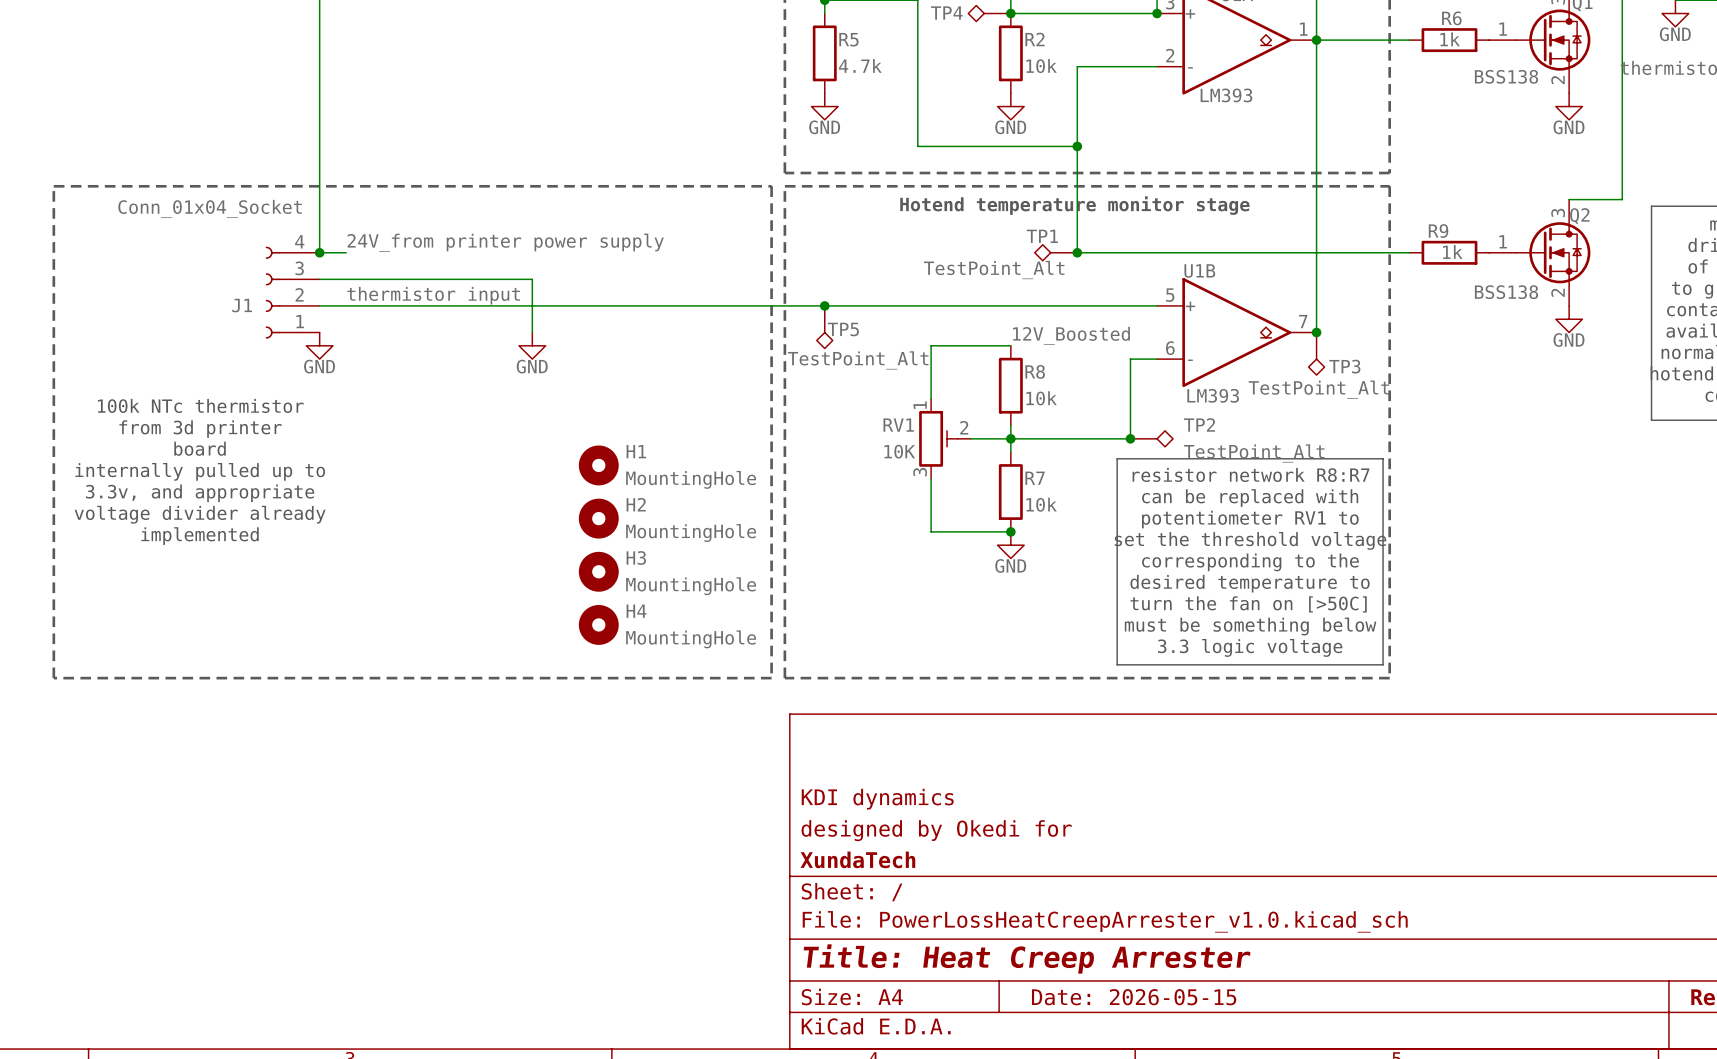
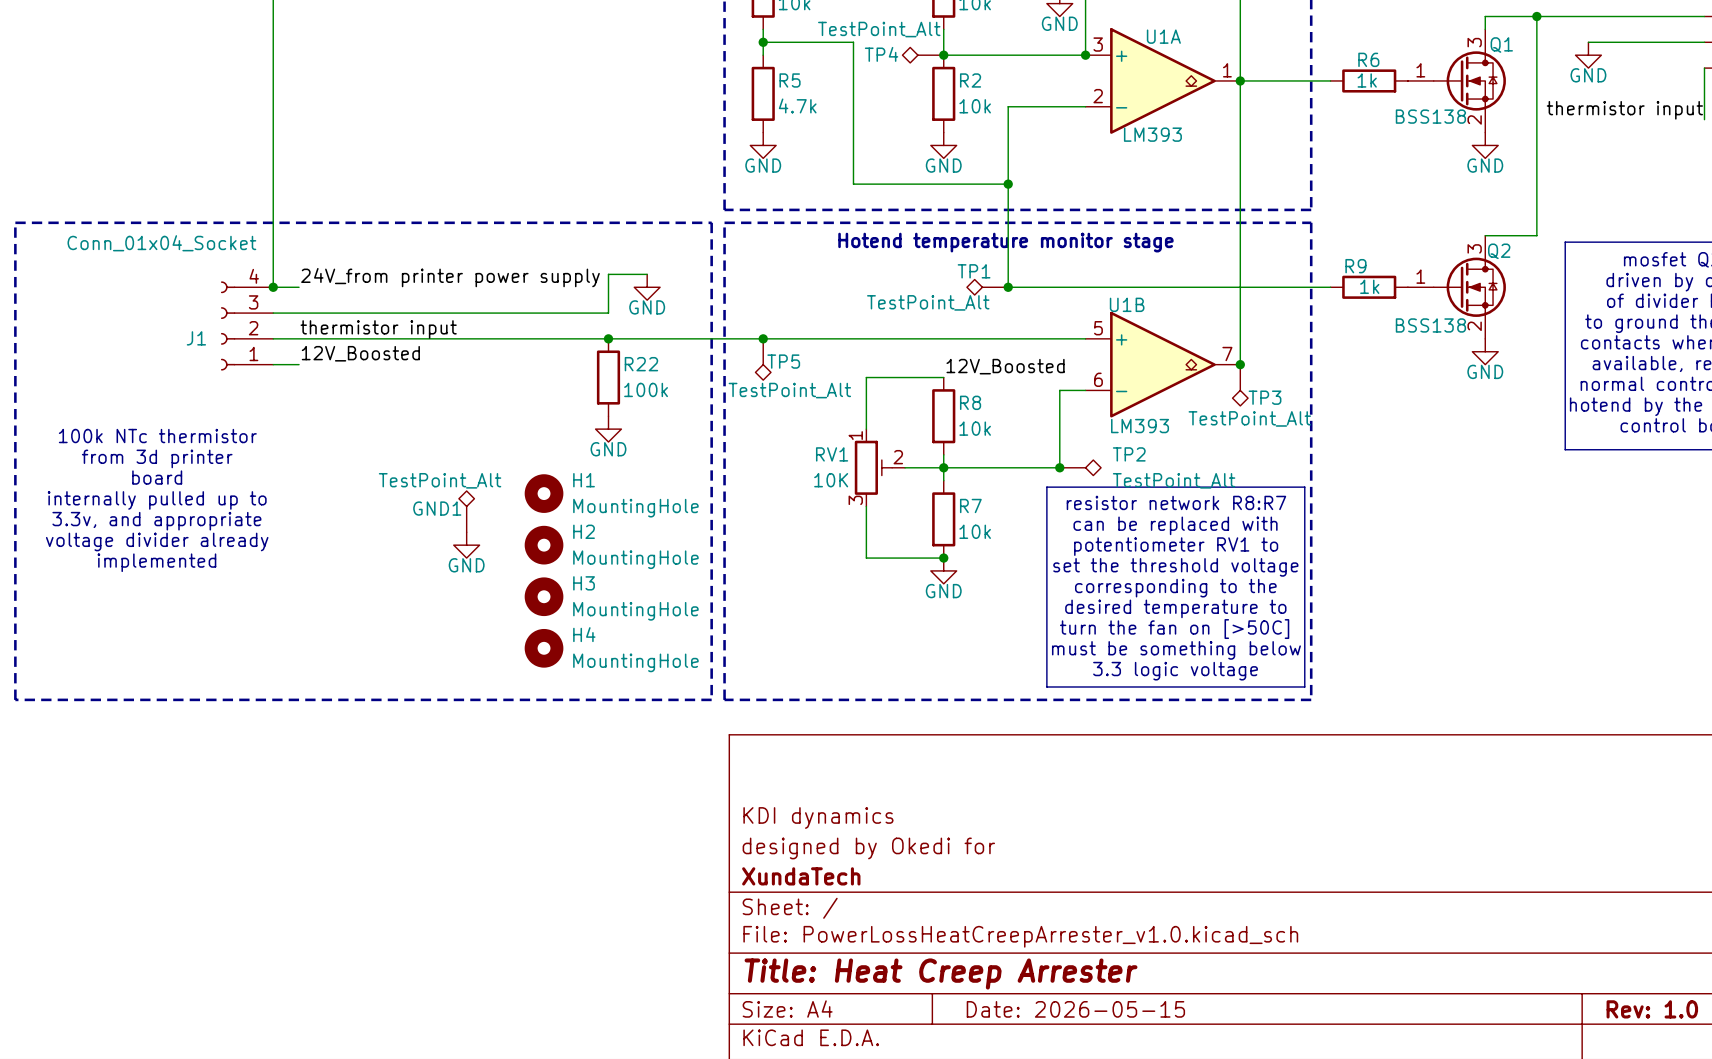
power symbol: none -> GND (647, 287)
wire: (532, 279) (532, 332) -> (479, 313) (608, 313) (608, 274) (647, 274)
junction: none -> (608, 338)
label: none -> 12V_Boosted (360, 353)
wire: none -> (273, 364) (299, 364)
power symbol: GND (319, 345) -> none
power symbol: GND (532, 345) -> none
R22: none -> 100k (608, 377)
power symbol: none -> GND (608, 429)
GND1: none -> TestPoint_Alt (466, 511)
power symbol: none -> GND (466, 545)

